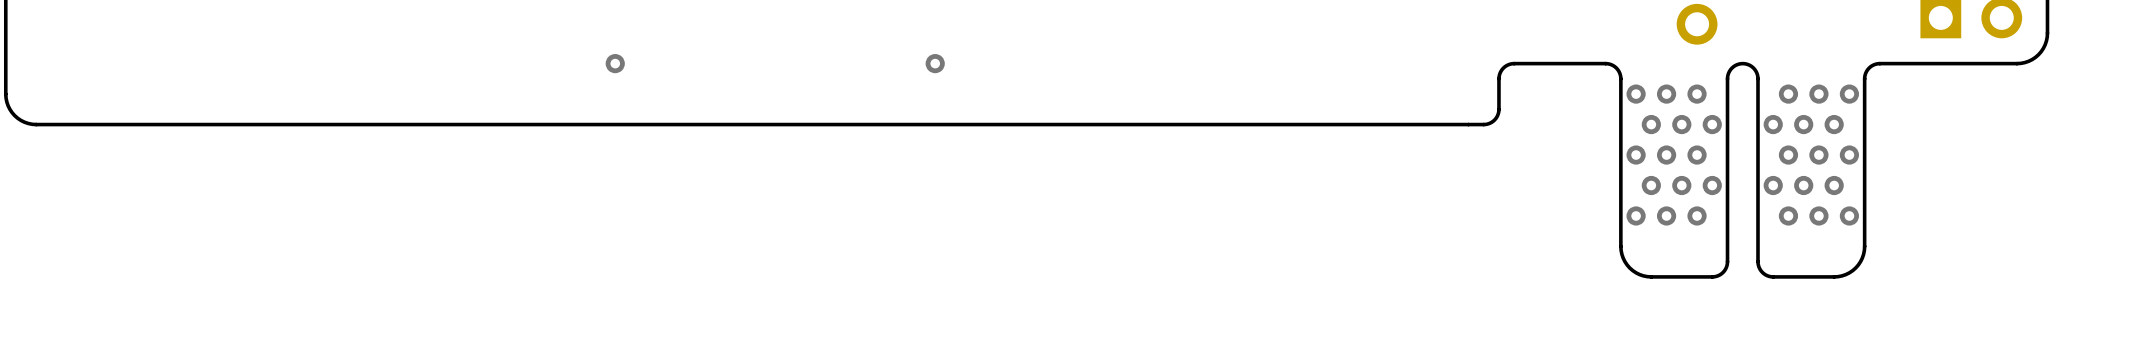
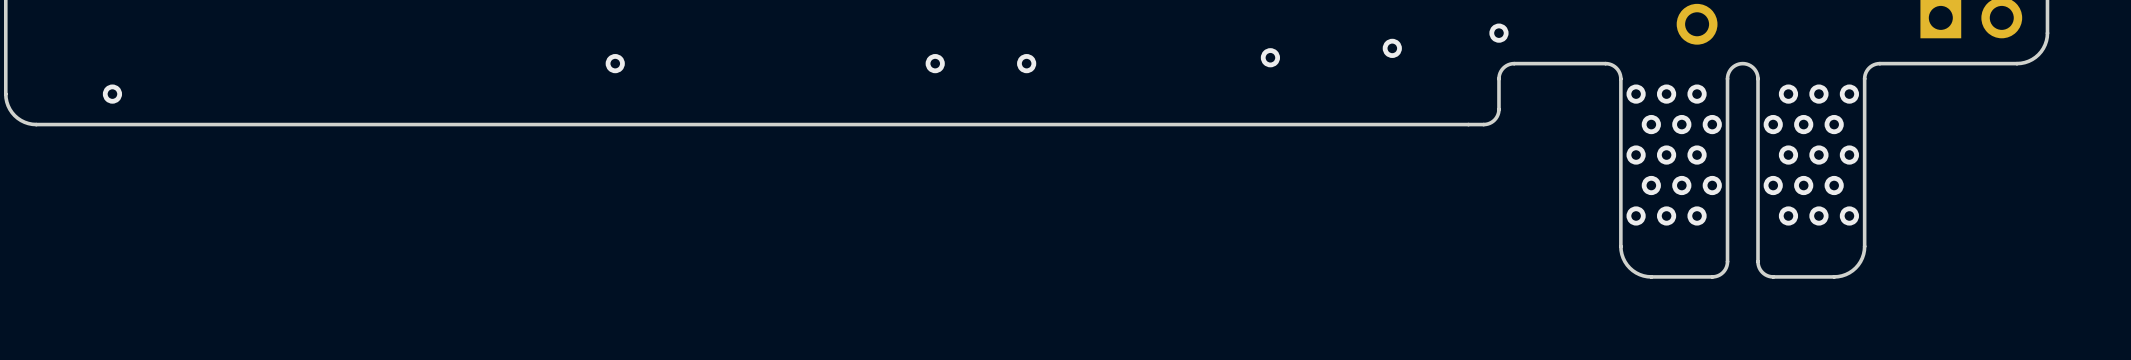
via: none -> (1498, 33)
via: none -> (1392, 48)
via: none -> (1270, 57)
via: none -> (1026, 63)
via: none -> (112, 94)

